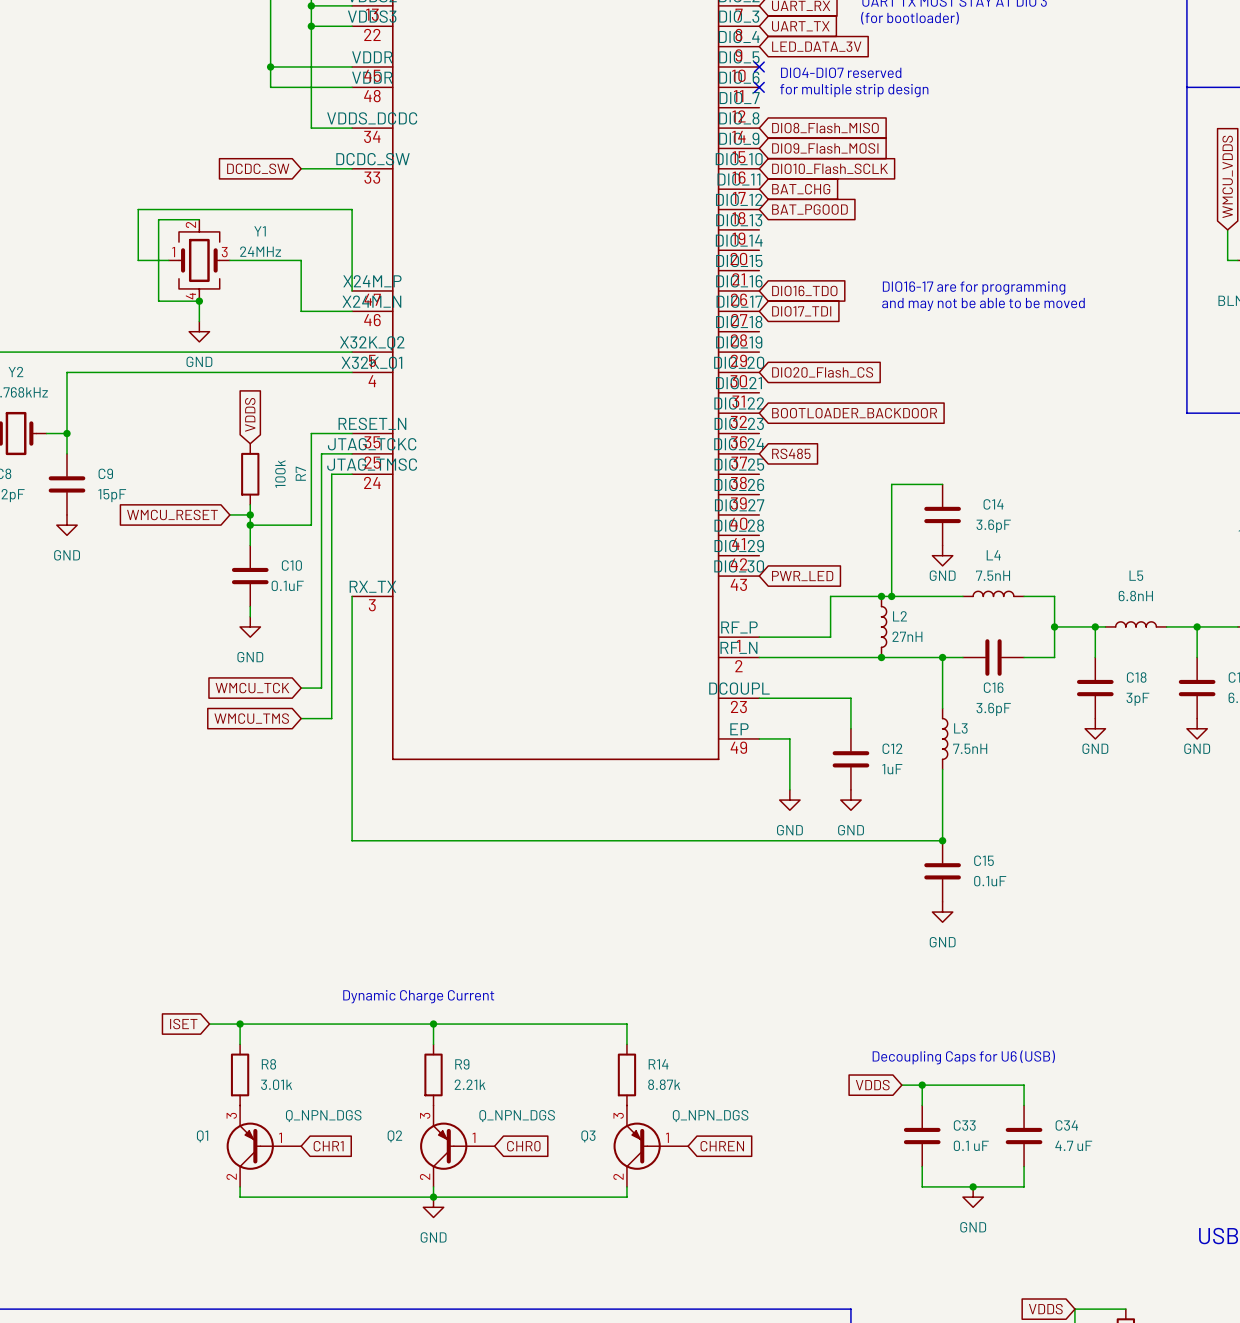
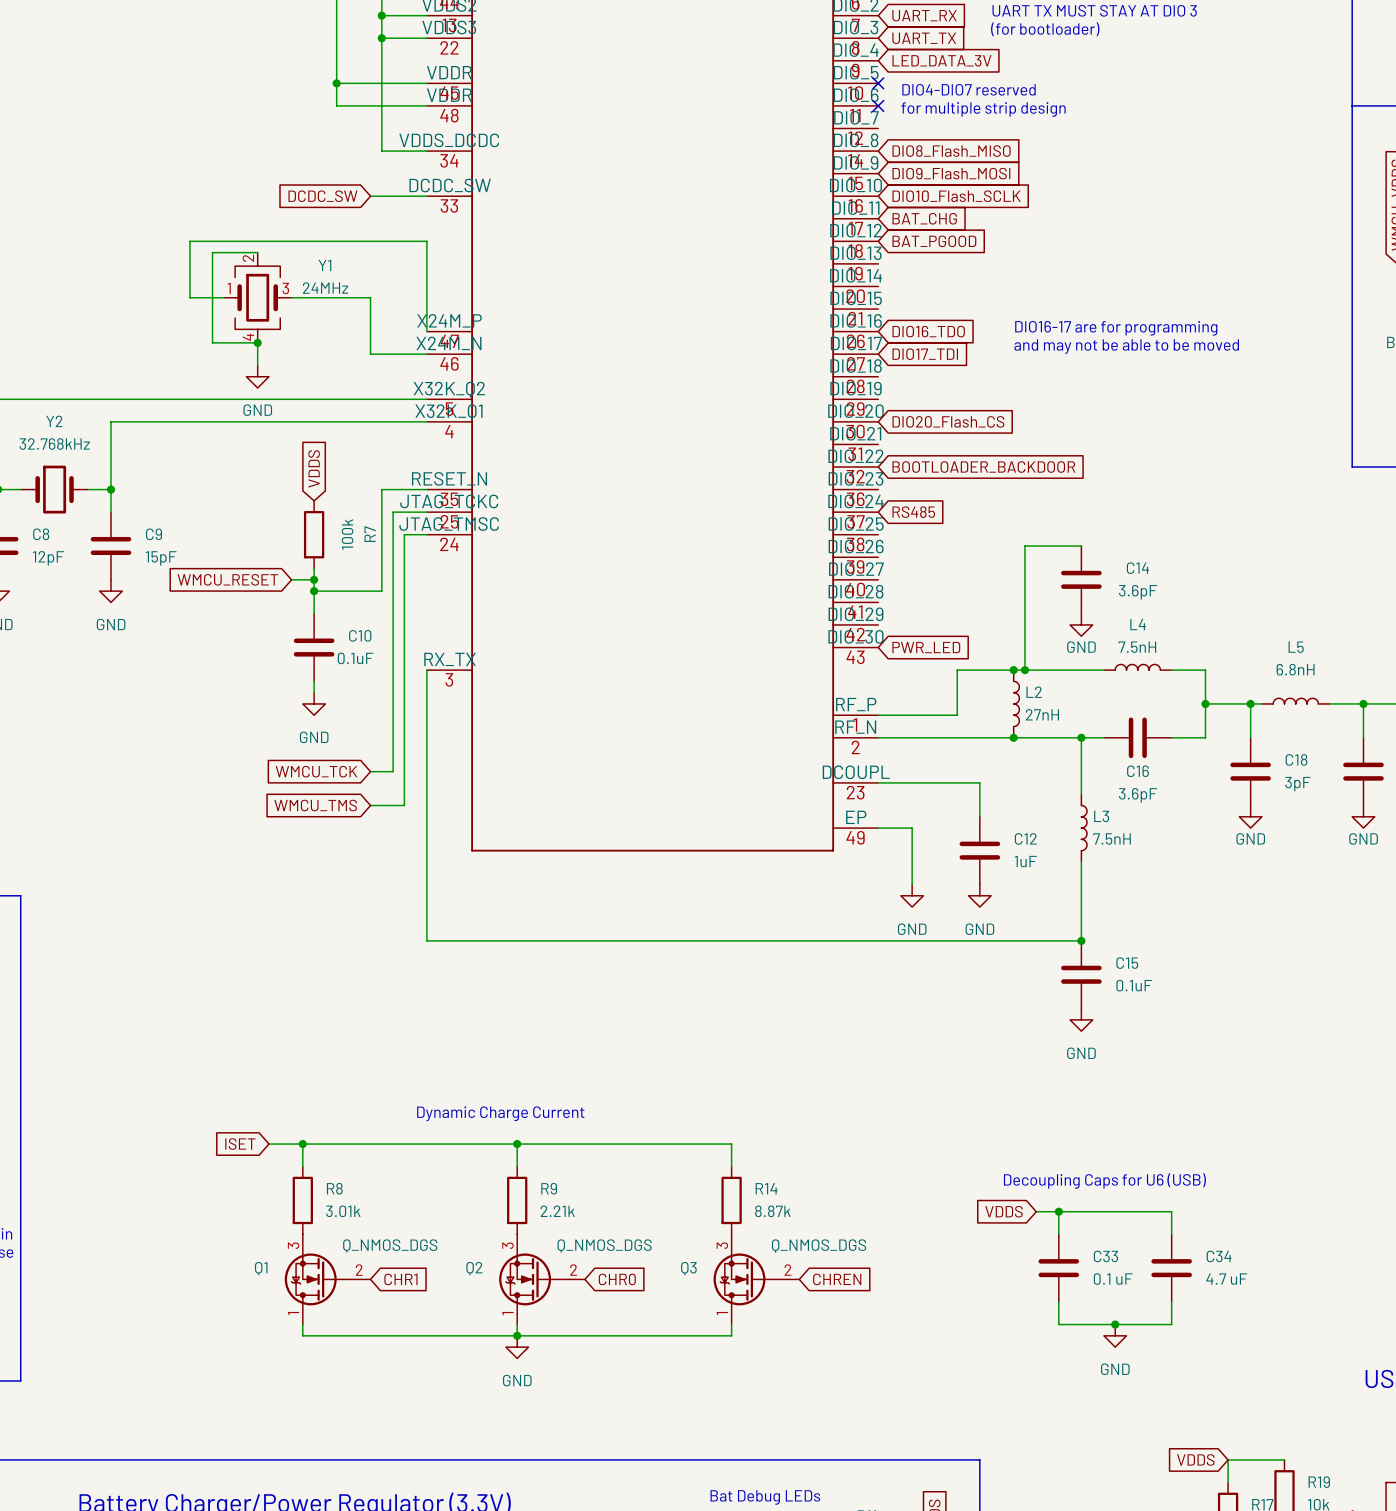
Q1 symbol: [226, 1105, 302, 1187] -> [284, 1234, 371, 1325]
Q2 symbol: [420, 1105, 495, 1187] -> [499, 1234, 585, 1325]
Q3 symbol: [613, 1105, 689, 1187] -> [713, 1234, 800, 1325]
Q1 value: Q_NPN_DGS (323, 1116) -> Q_NMOS_DGS (390, 1246)
Q2 value: Q_NPN_DGS (517, 1116) -> Q_NMOS_DGS (604, 1246)
Q3 value: Q_NPN_DGS (710, 1116) -> Q_NMOS_DGS (819, 1246)

